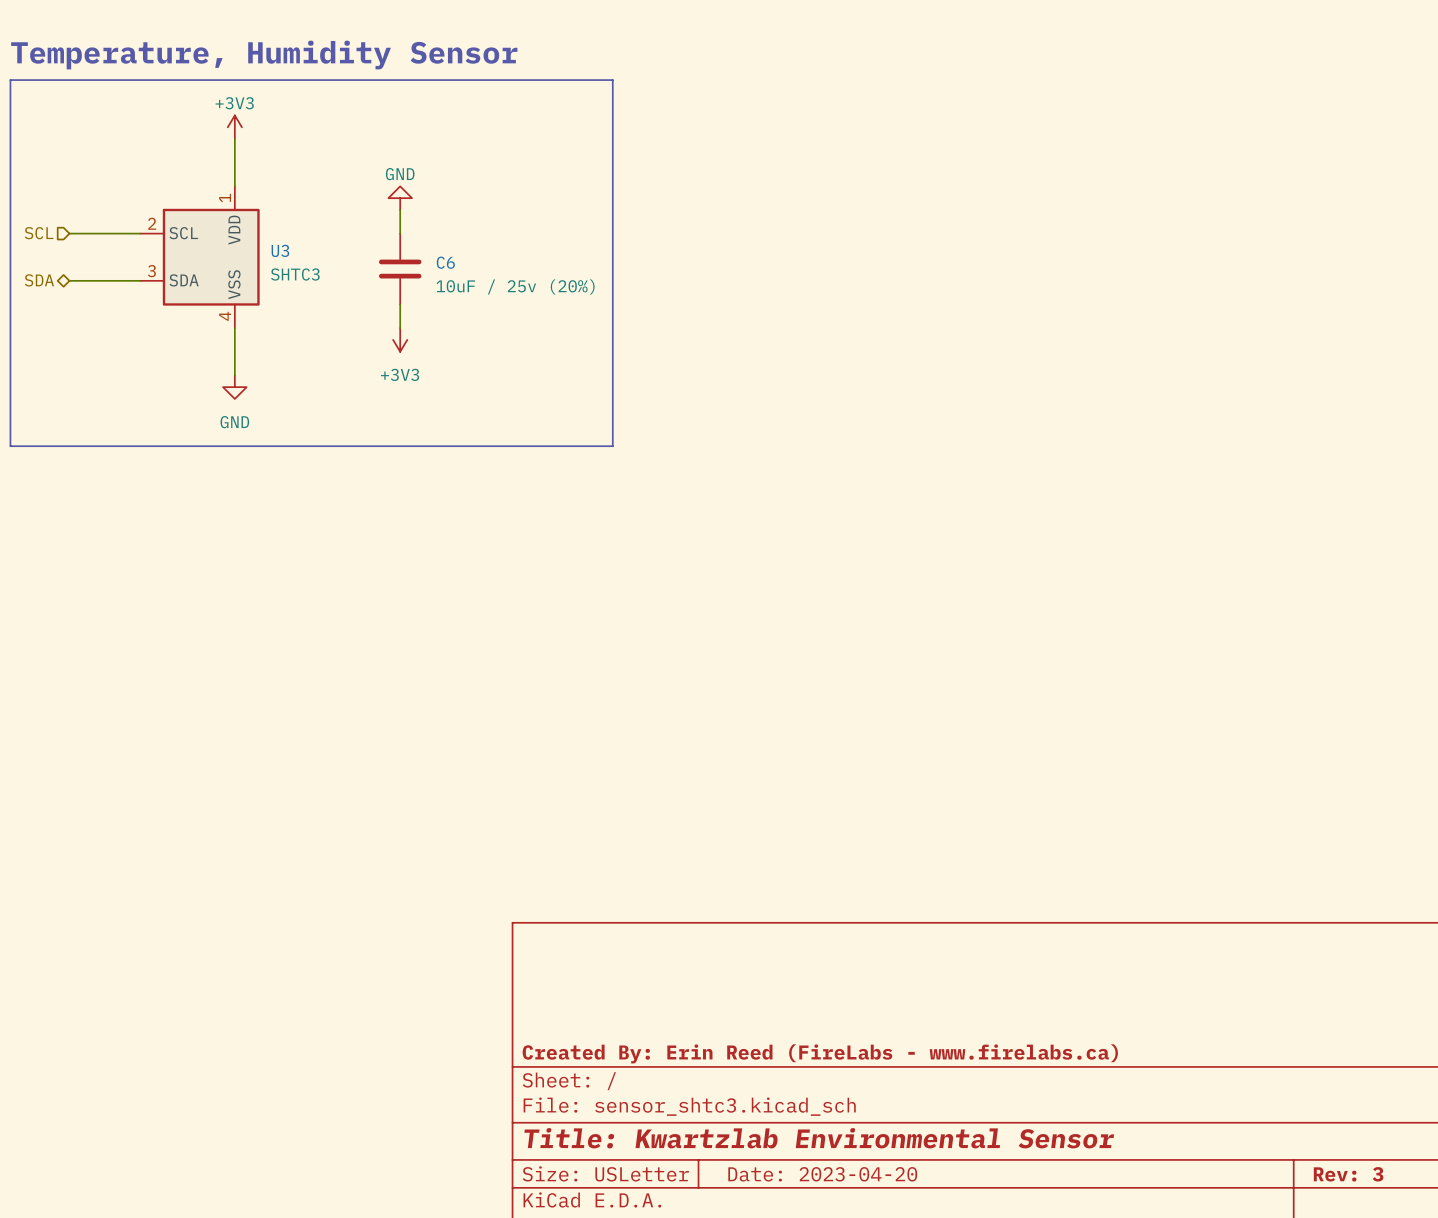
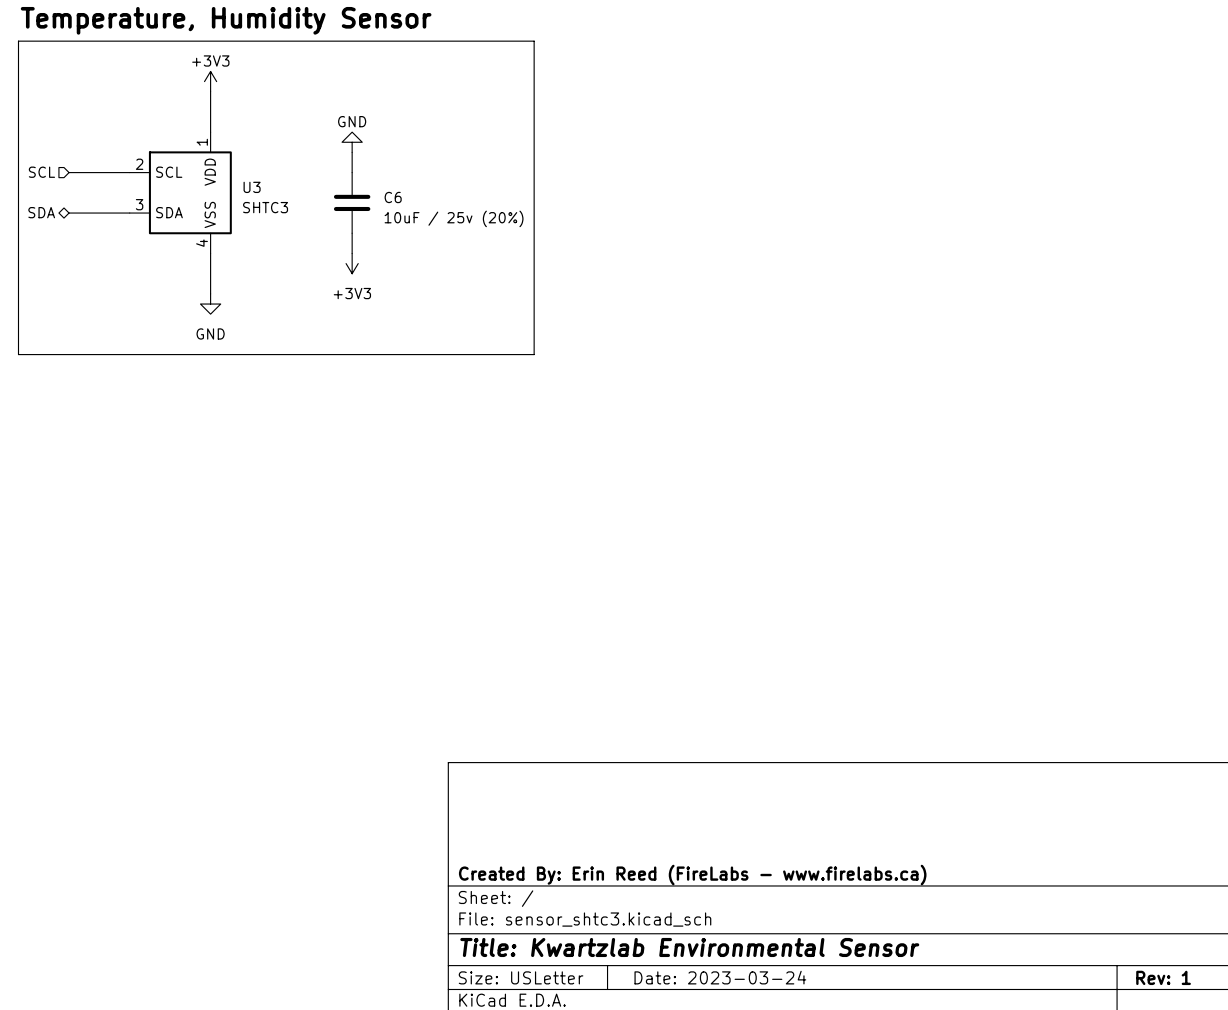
title block: Date: 2023-04-20 (822, 1174) -> Date: 2023-03-24 (720, 977)
title block: Rev: 3 (1348, 1174) -> Rev: 1 (1163, 977)

